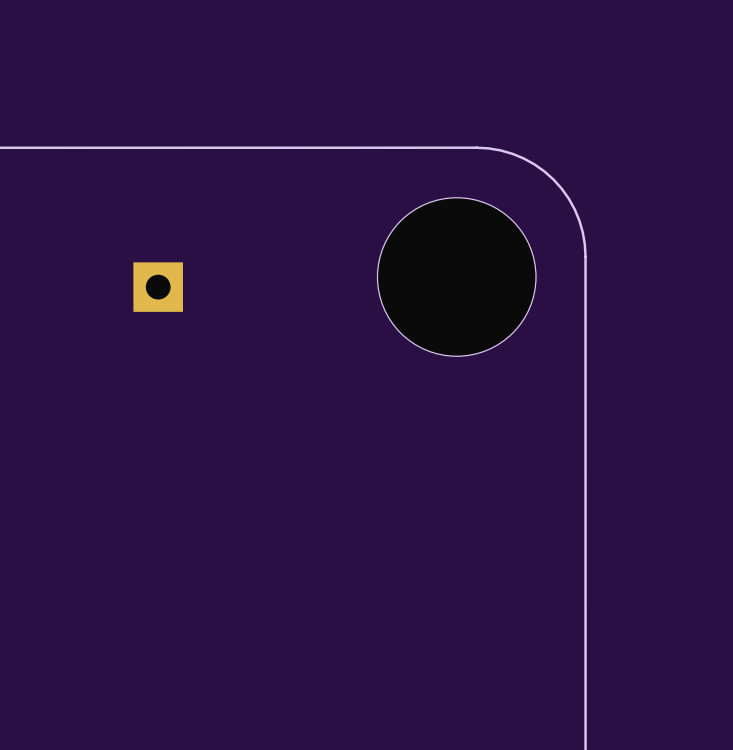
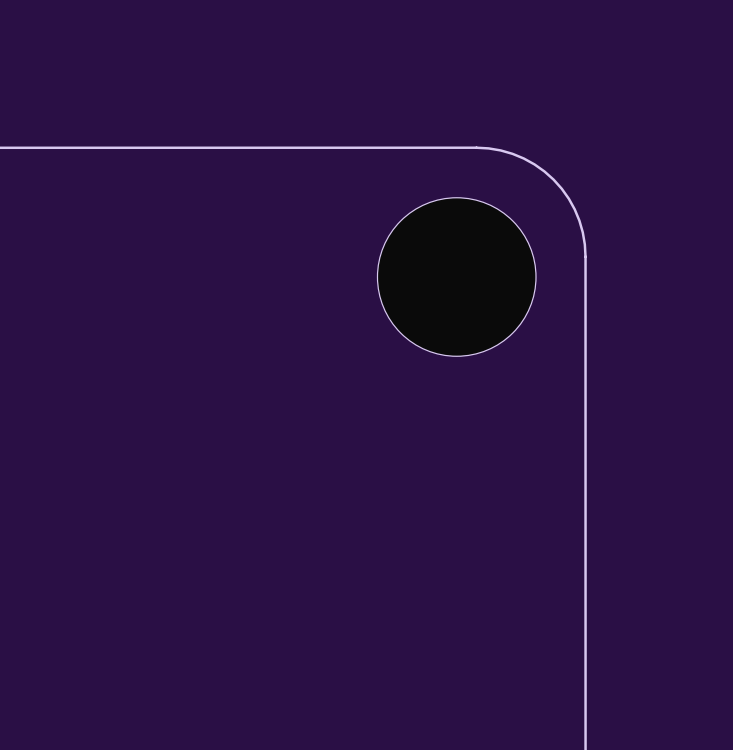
part: (158, 287) -> none

